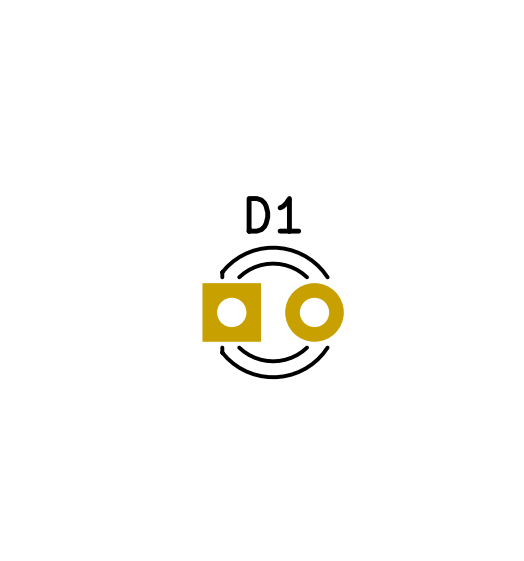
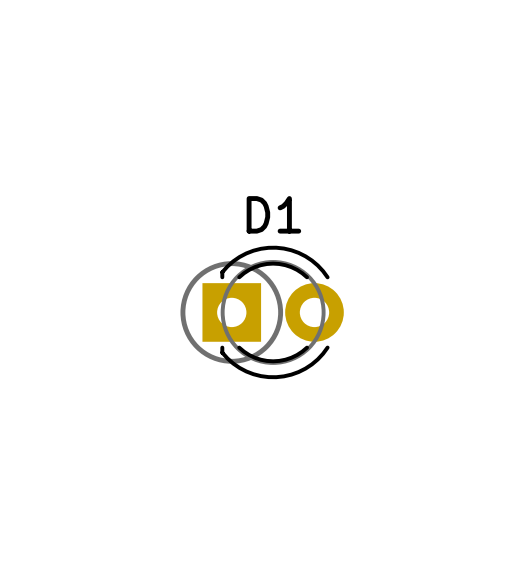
D1 footprint: [202, 245, 344, 380] -> [180, 245, 344, 380]
drawing: none -> [220, 260, 326, 365]

